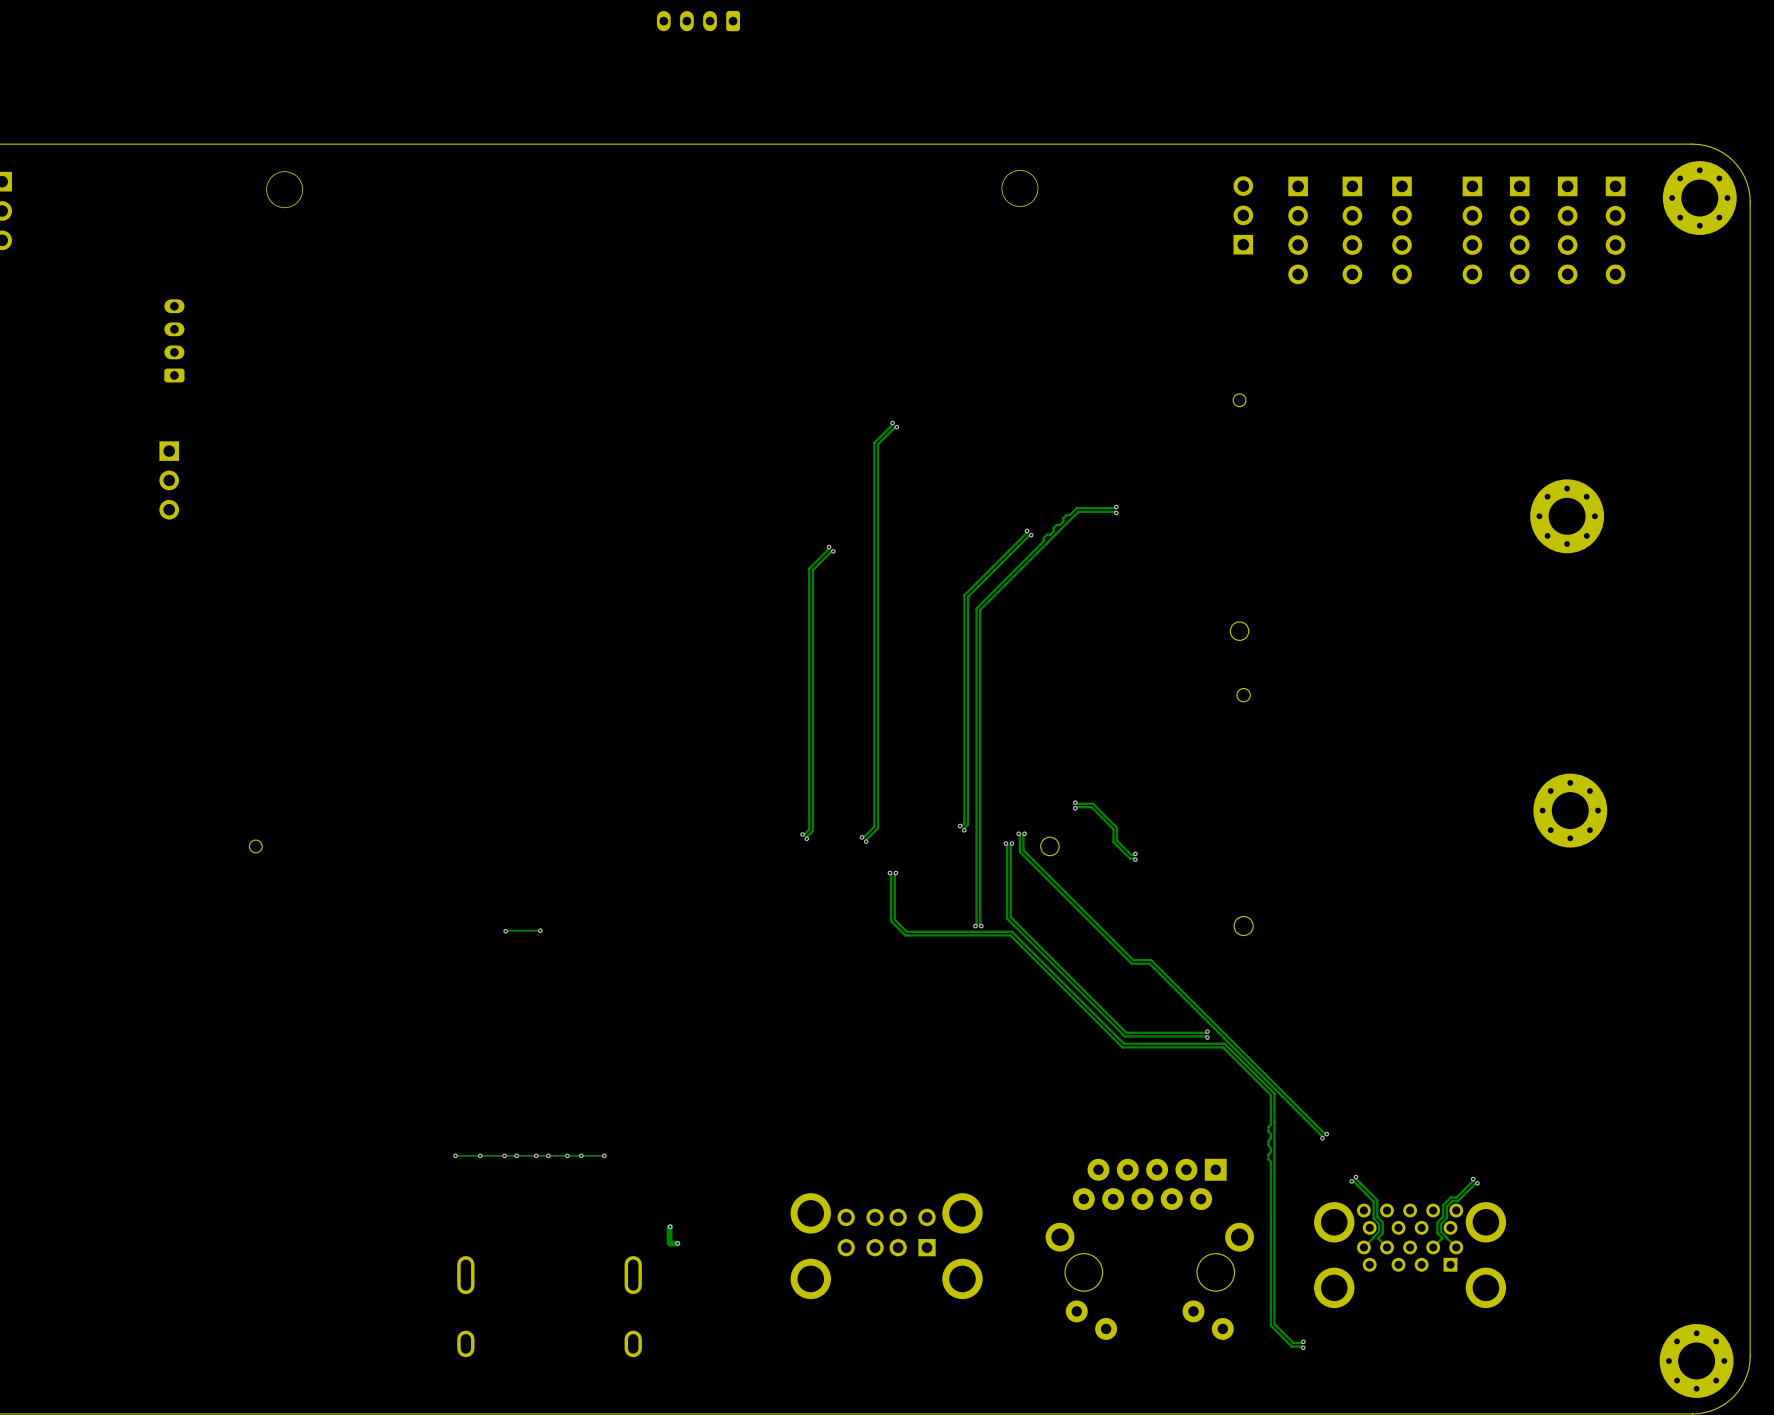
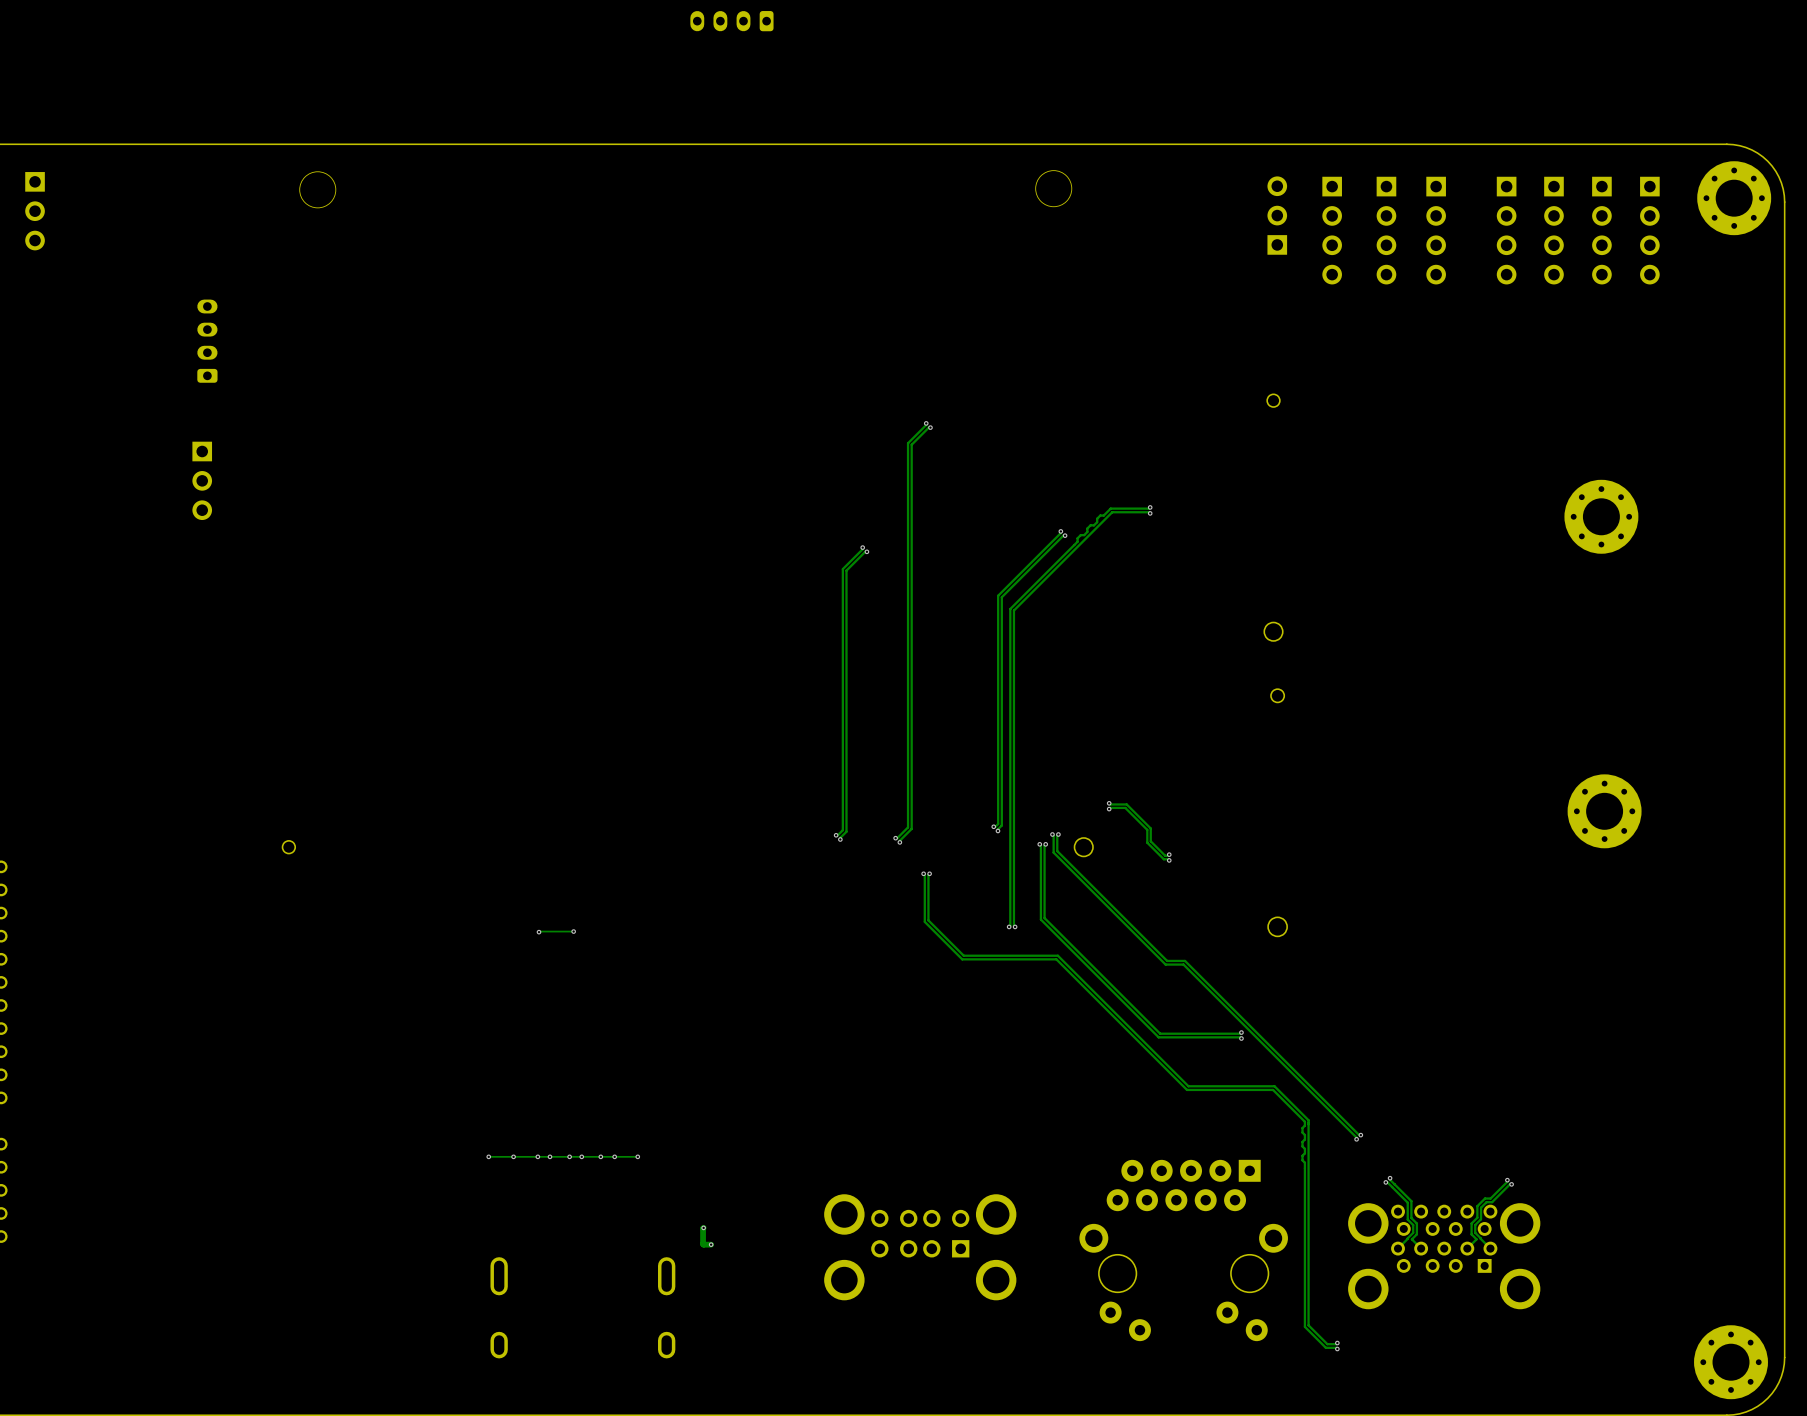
track: (894, 919) (906, 931) (1012, 931) (1123, 1043) (1224, 1043) (1274, 1093) (1274, 1119) -> (928, 920) (963, 955) (1057, 955) (1188, 1086) (1274, 1086) (1308, 1120)
track: (891, 921) (905, 935) (1010, 935) (1122, 1047) (1223, 1047) (1270, 1095) (1270, 1120) -> (924, 921) (962, 959) (1056, 959) (1186, 1089) (1273, 1089) (1304, 1121)

